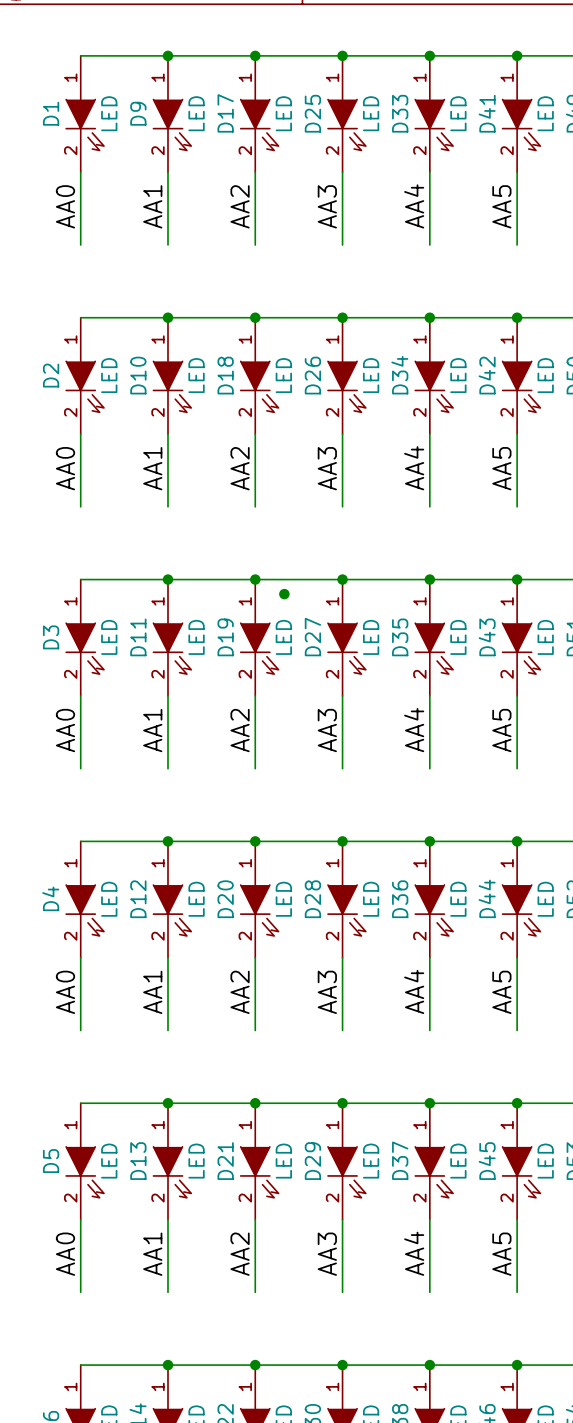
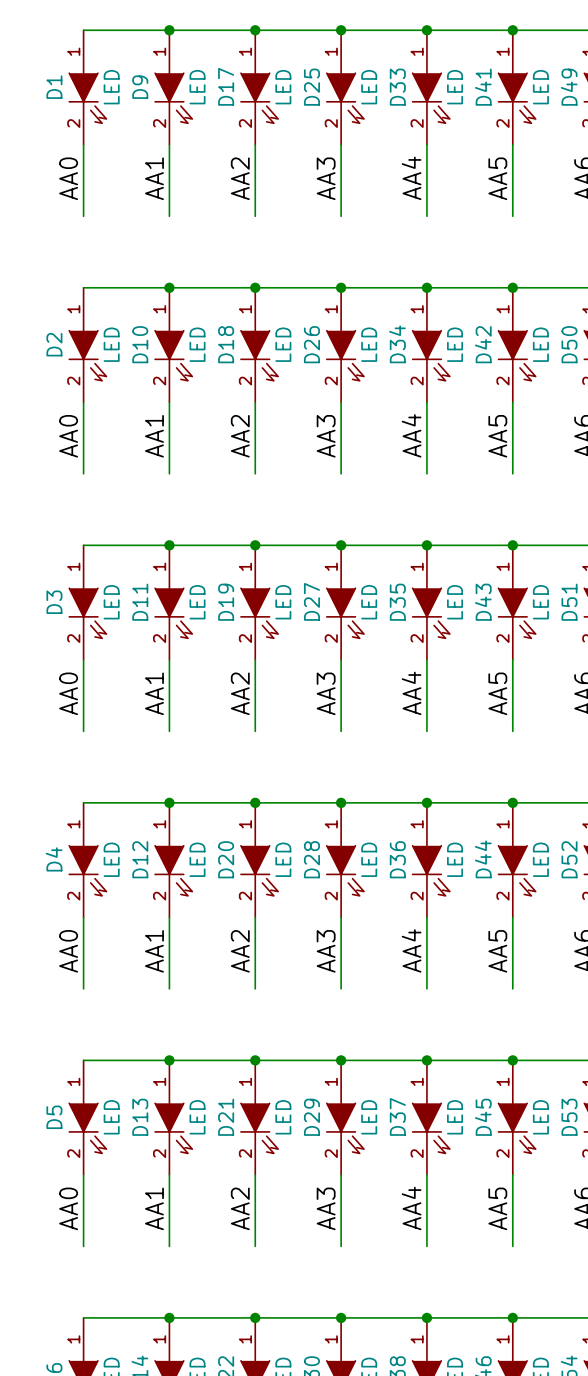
junction: (284, 594) -> none

